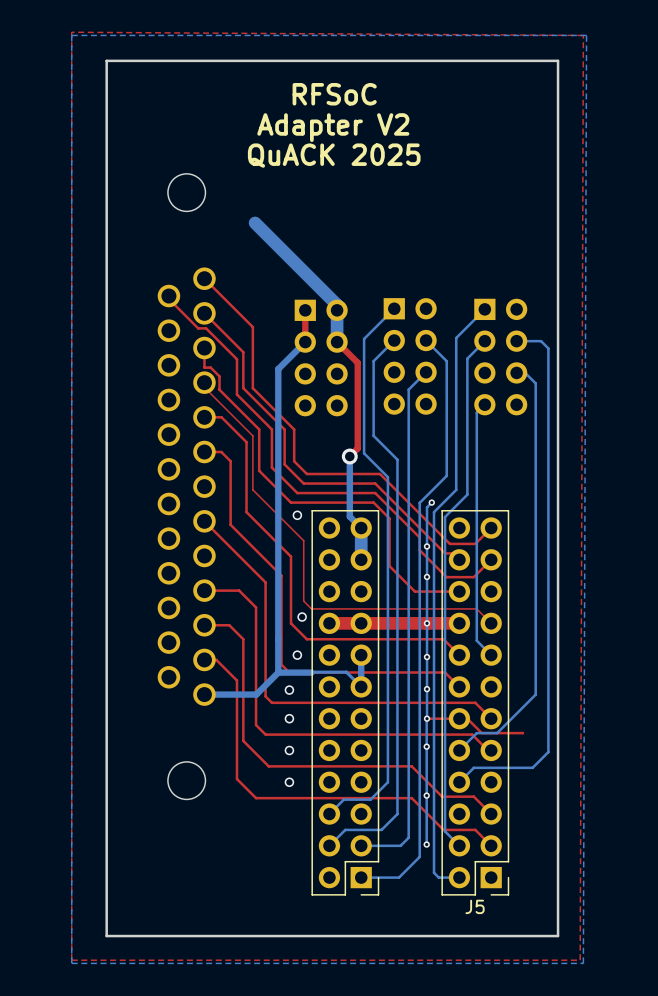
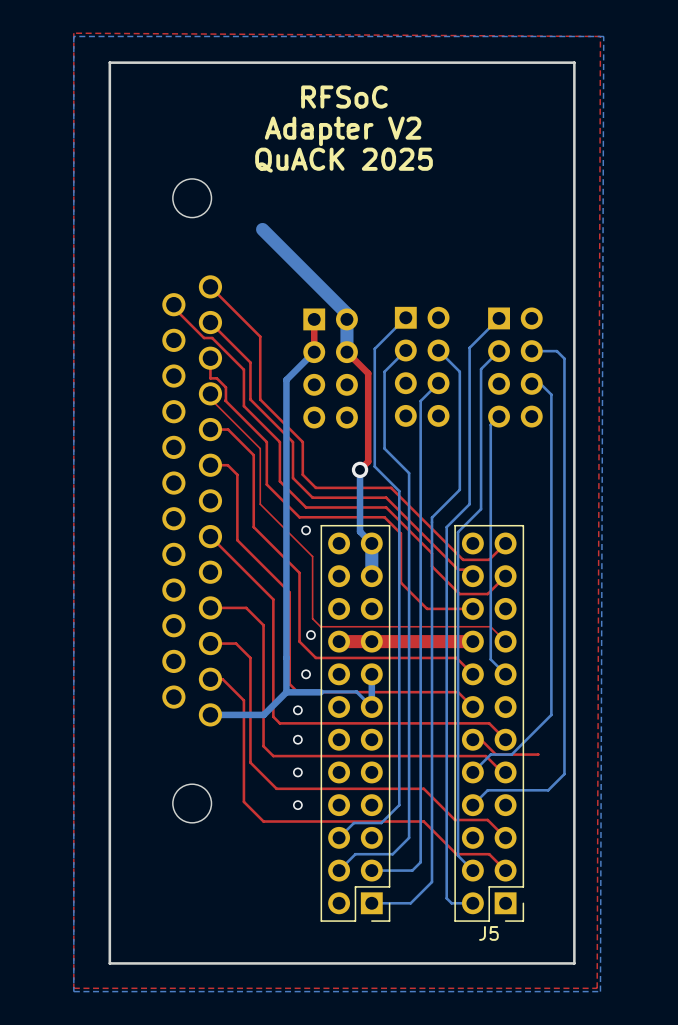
bottom track: (431, 502) (427, 507) (426, 844) -> none
via: (431, 502) -> none
via: (427, 546) -> none
via: (427, 576) -> none
via: (427, 623) -> none
via: (427, 657) -> none
via: (427, 689) -> none
via: (427, 718) -> none
top track: (459, 718) (427, 718) -> none
via: (426, 746) -> none
via: (426, 795) -> none
via: (426, 844) -> none

